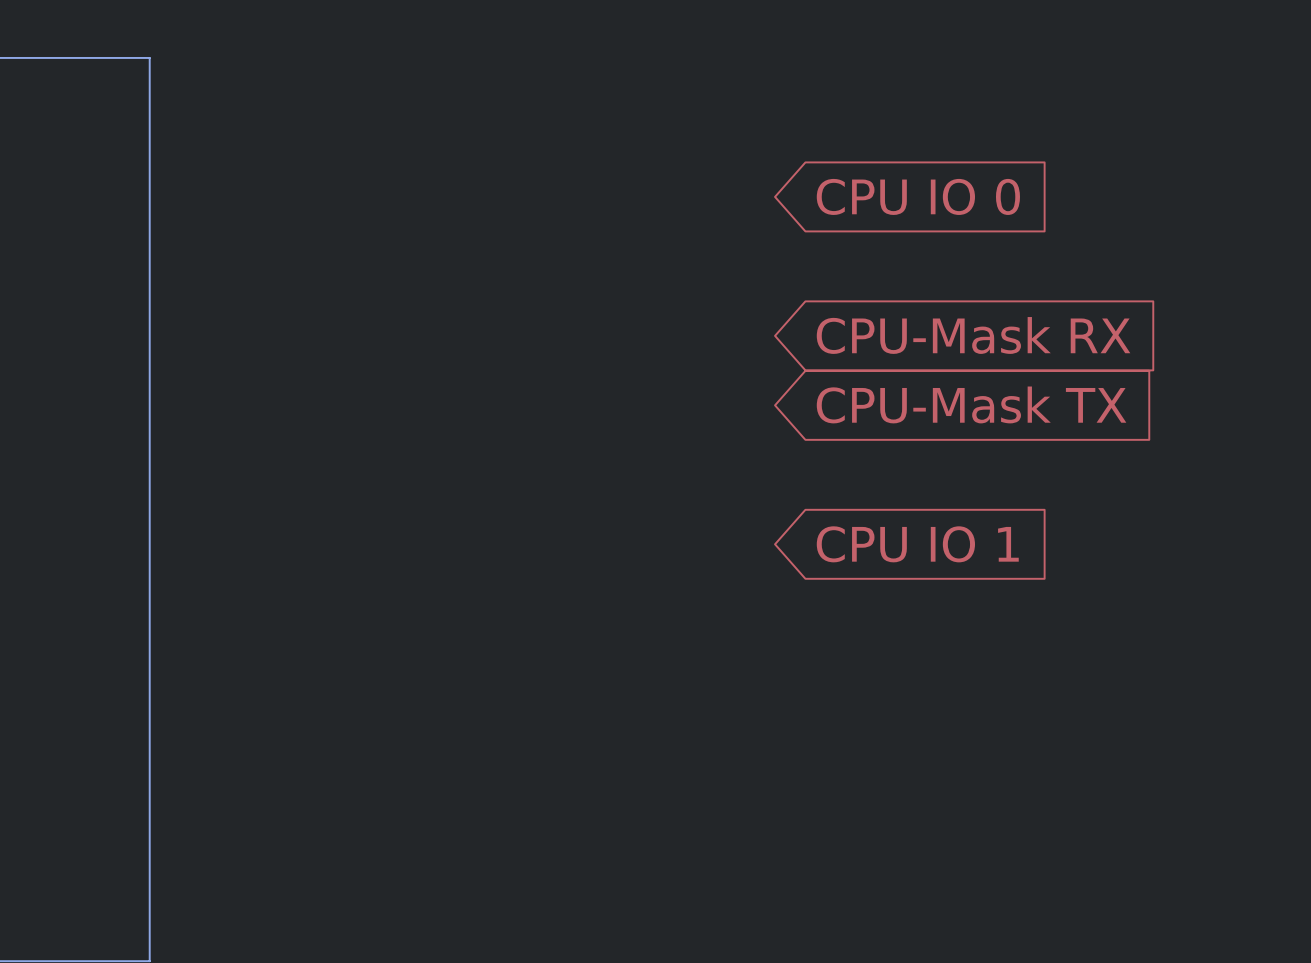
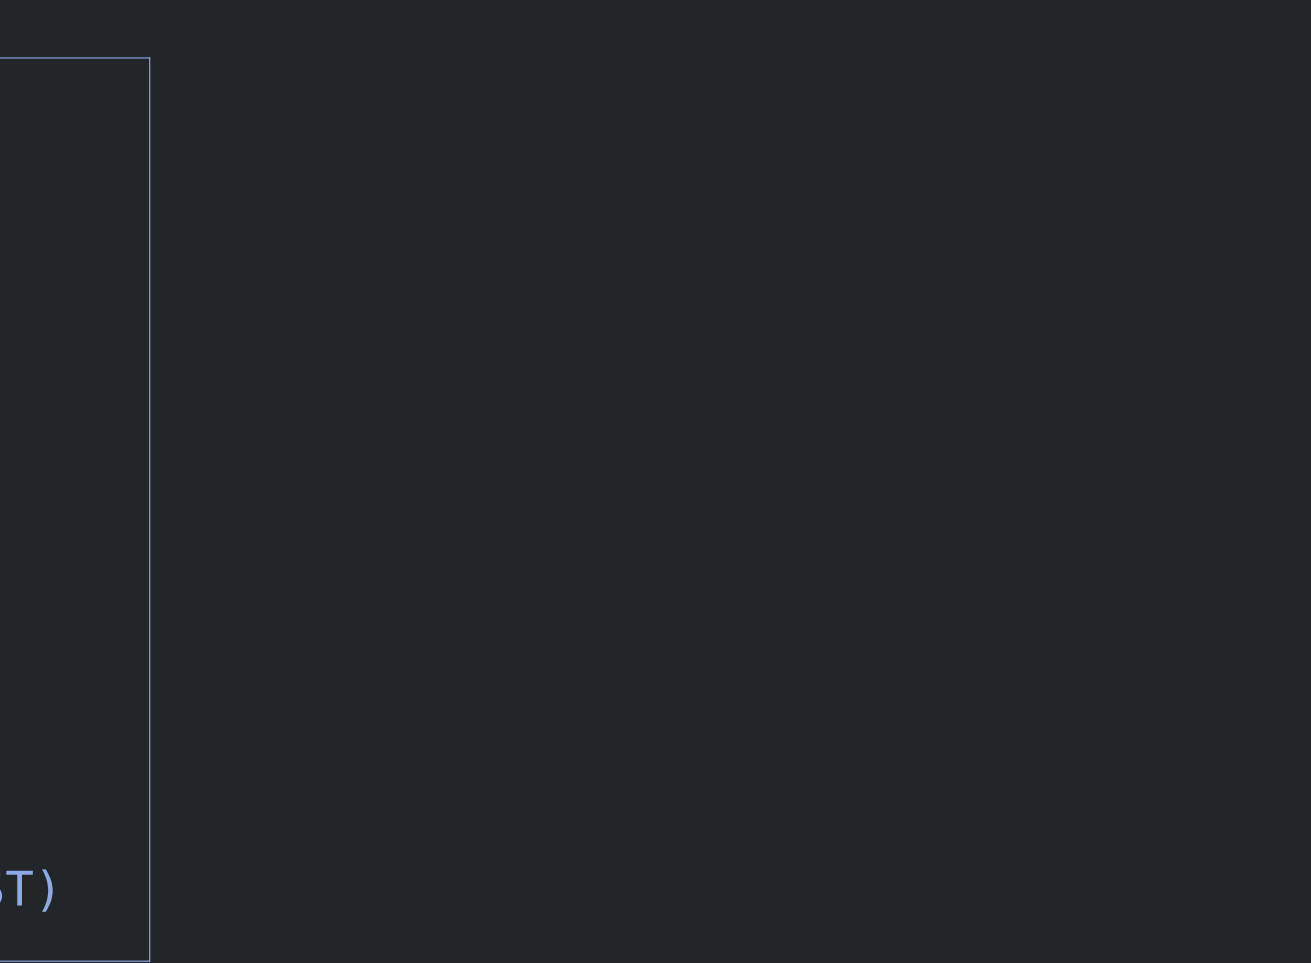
global label: CPU IO 0 (918, 196) -> none
global label: CPU-Mask RX (973, 335) -> none
global label: CPU-Mask TX (971, 404) -> none
global label: CPU IO 1 (917, 544) -> none

